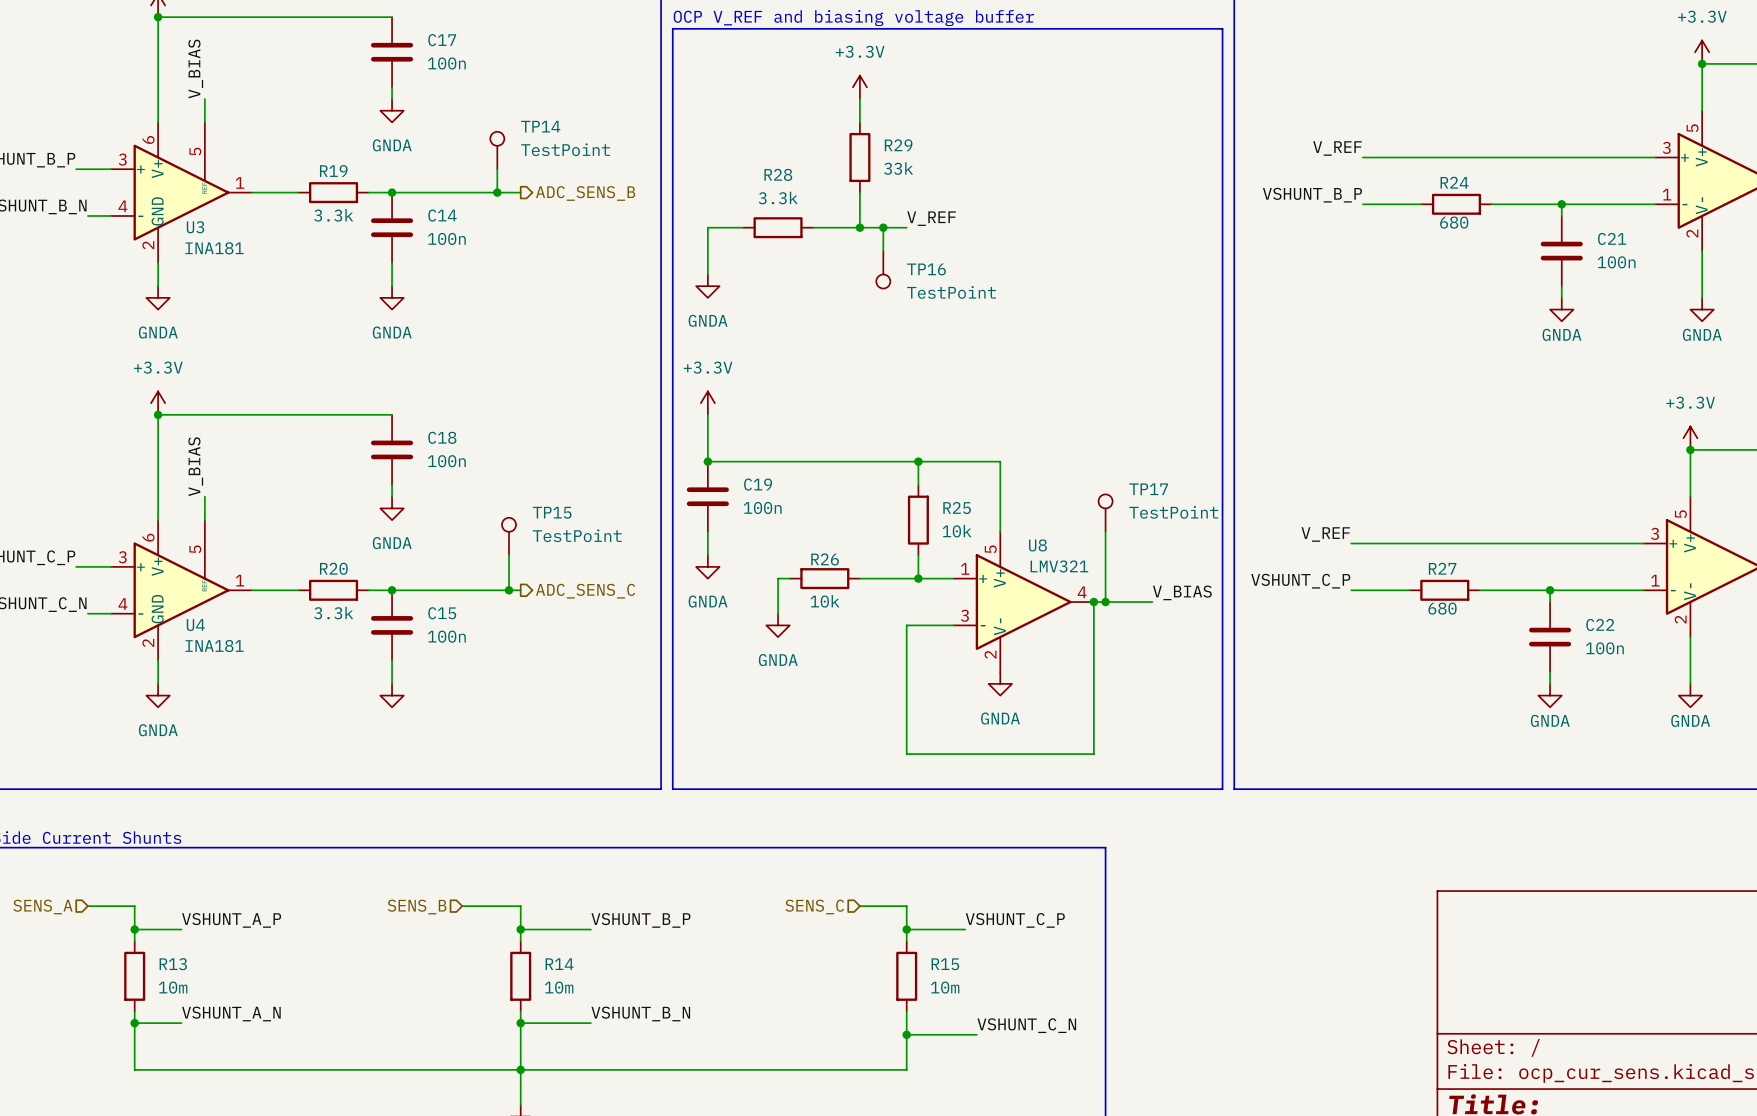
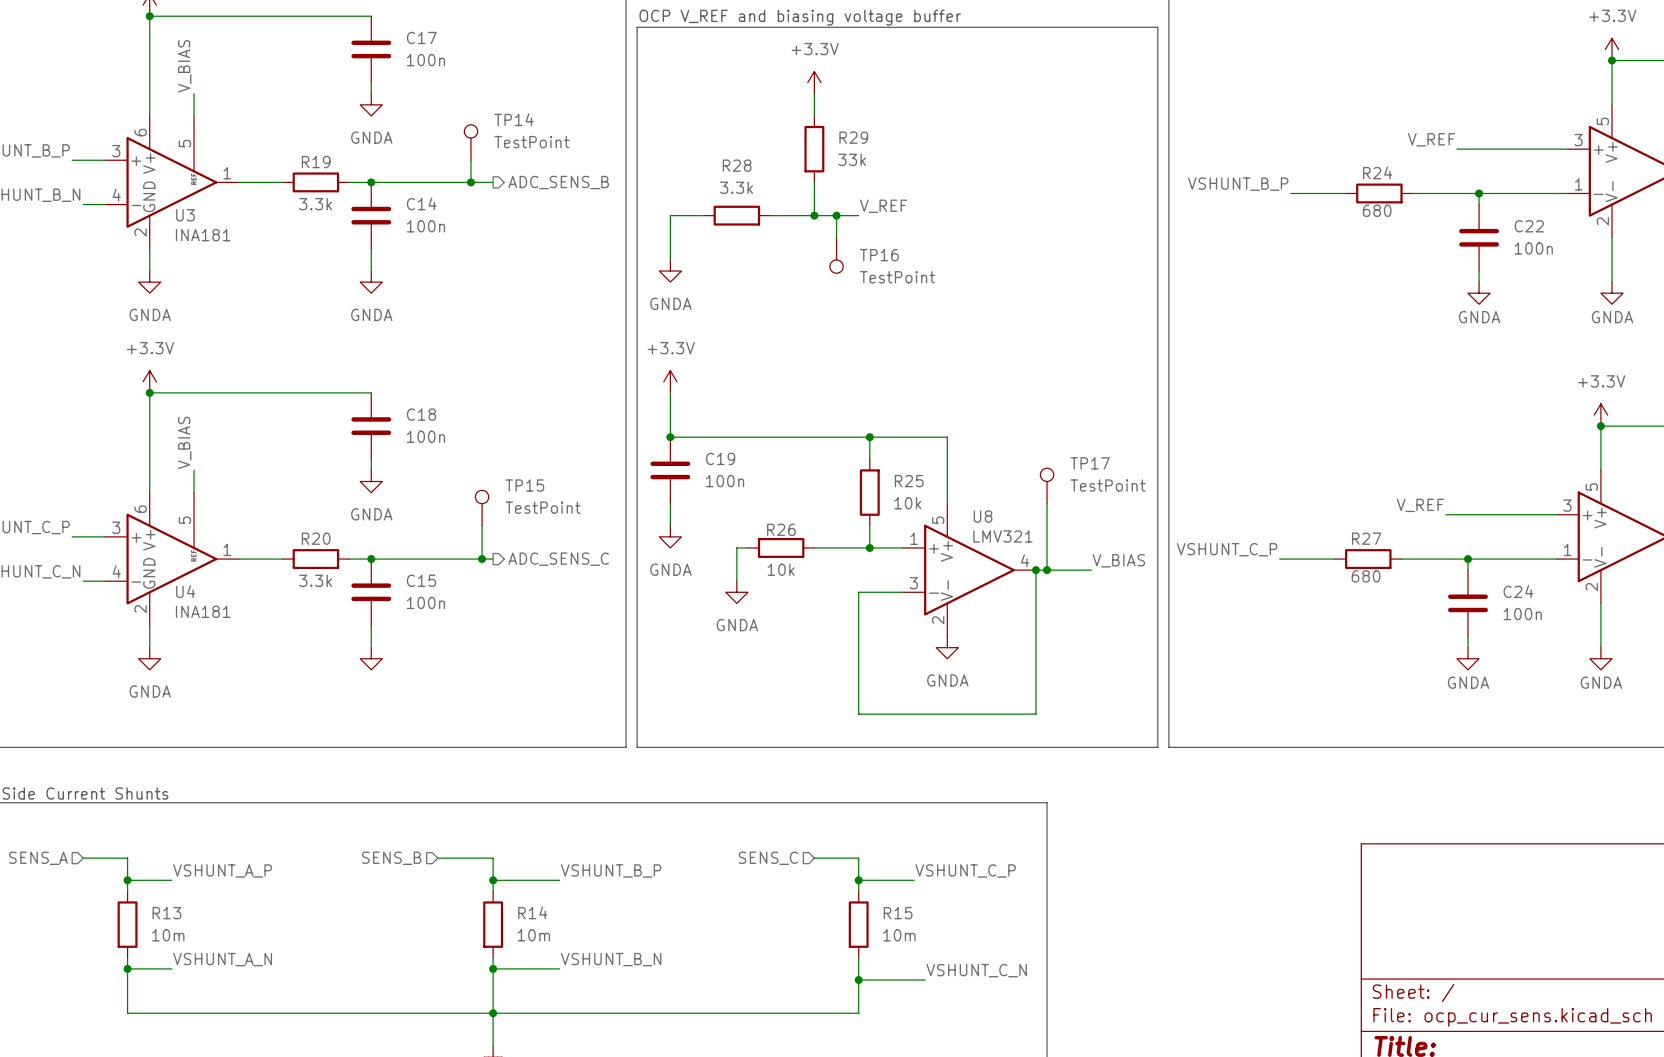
label position: V_REF (1337, 148) -> V_REF (1431, 139)
wire: (1362, 157) (1538, 157) -> none
C21 name: C21 (1612, 238) -> C22 (1529, 226)
label position: V_REF (1325, 534) -> V_REF (1420, 505)
wire: (1351, 543) (1526, 543) -> none
C22 name: C22 (1600, 624) -> C24 (1518, 591)

